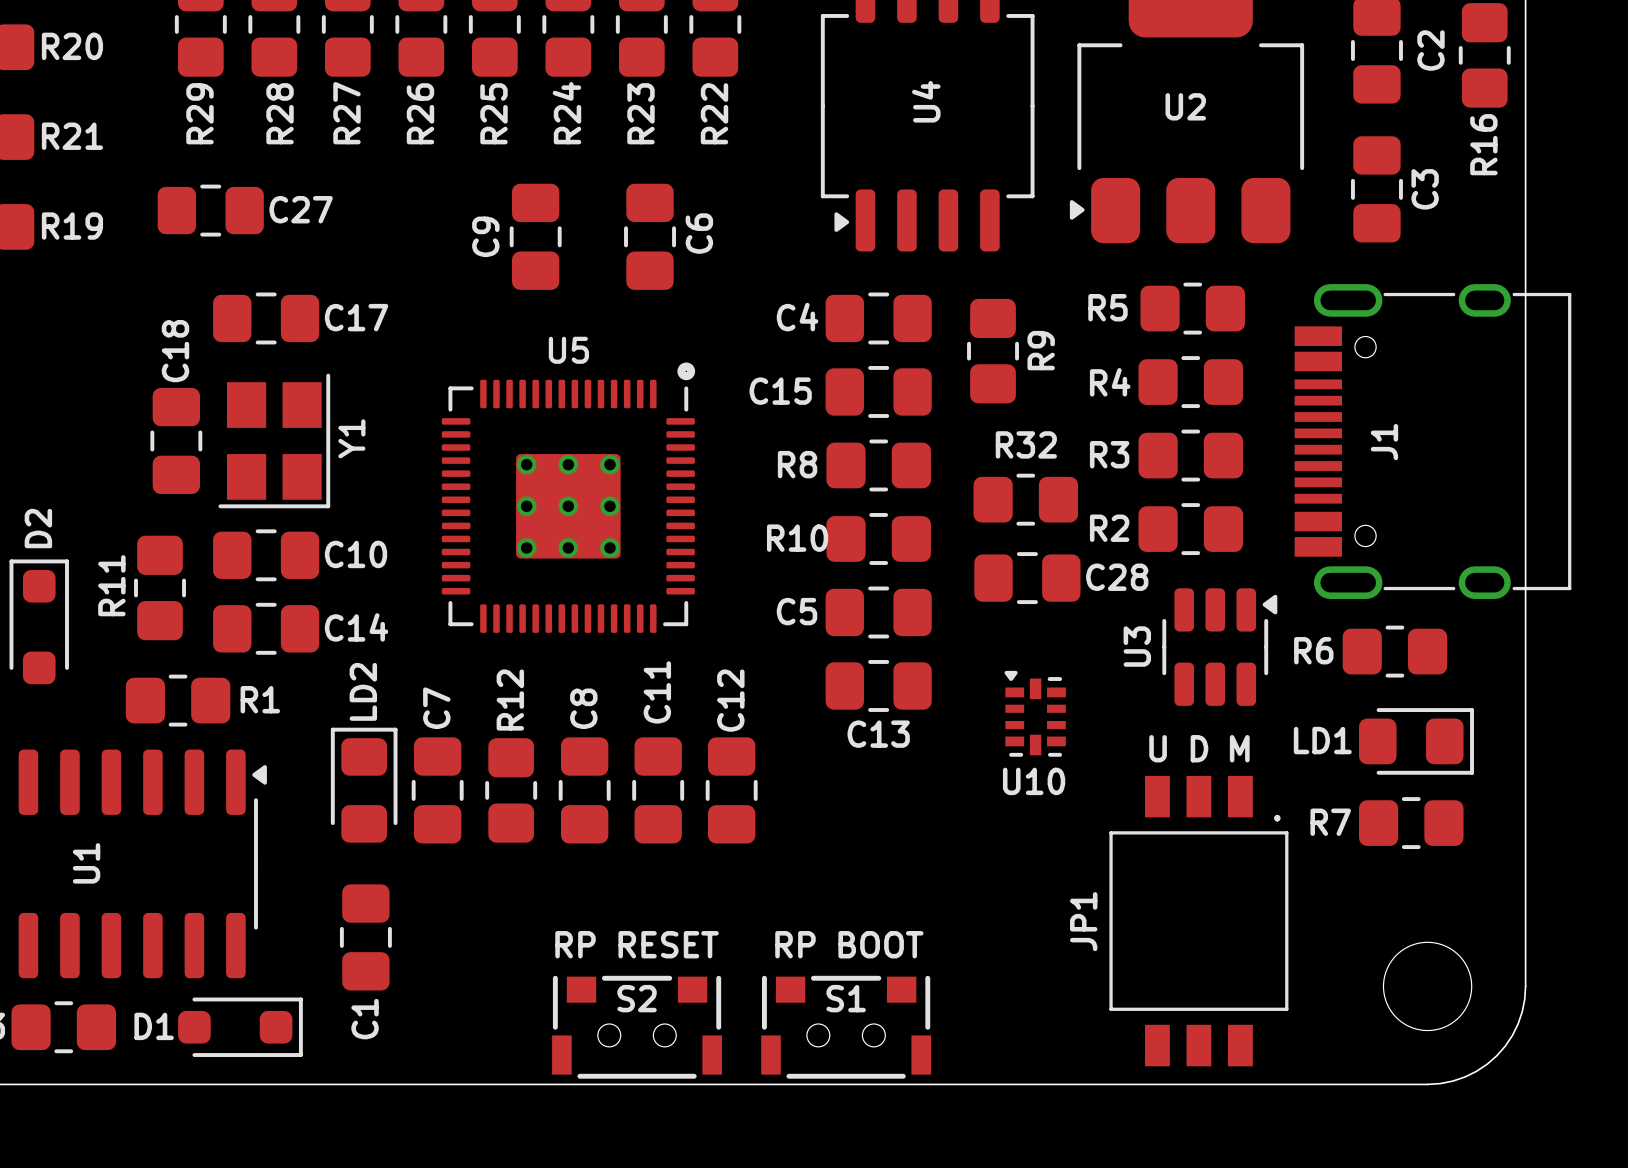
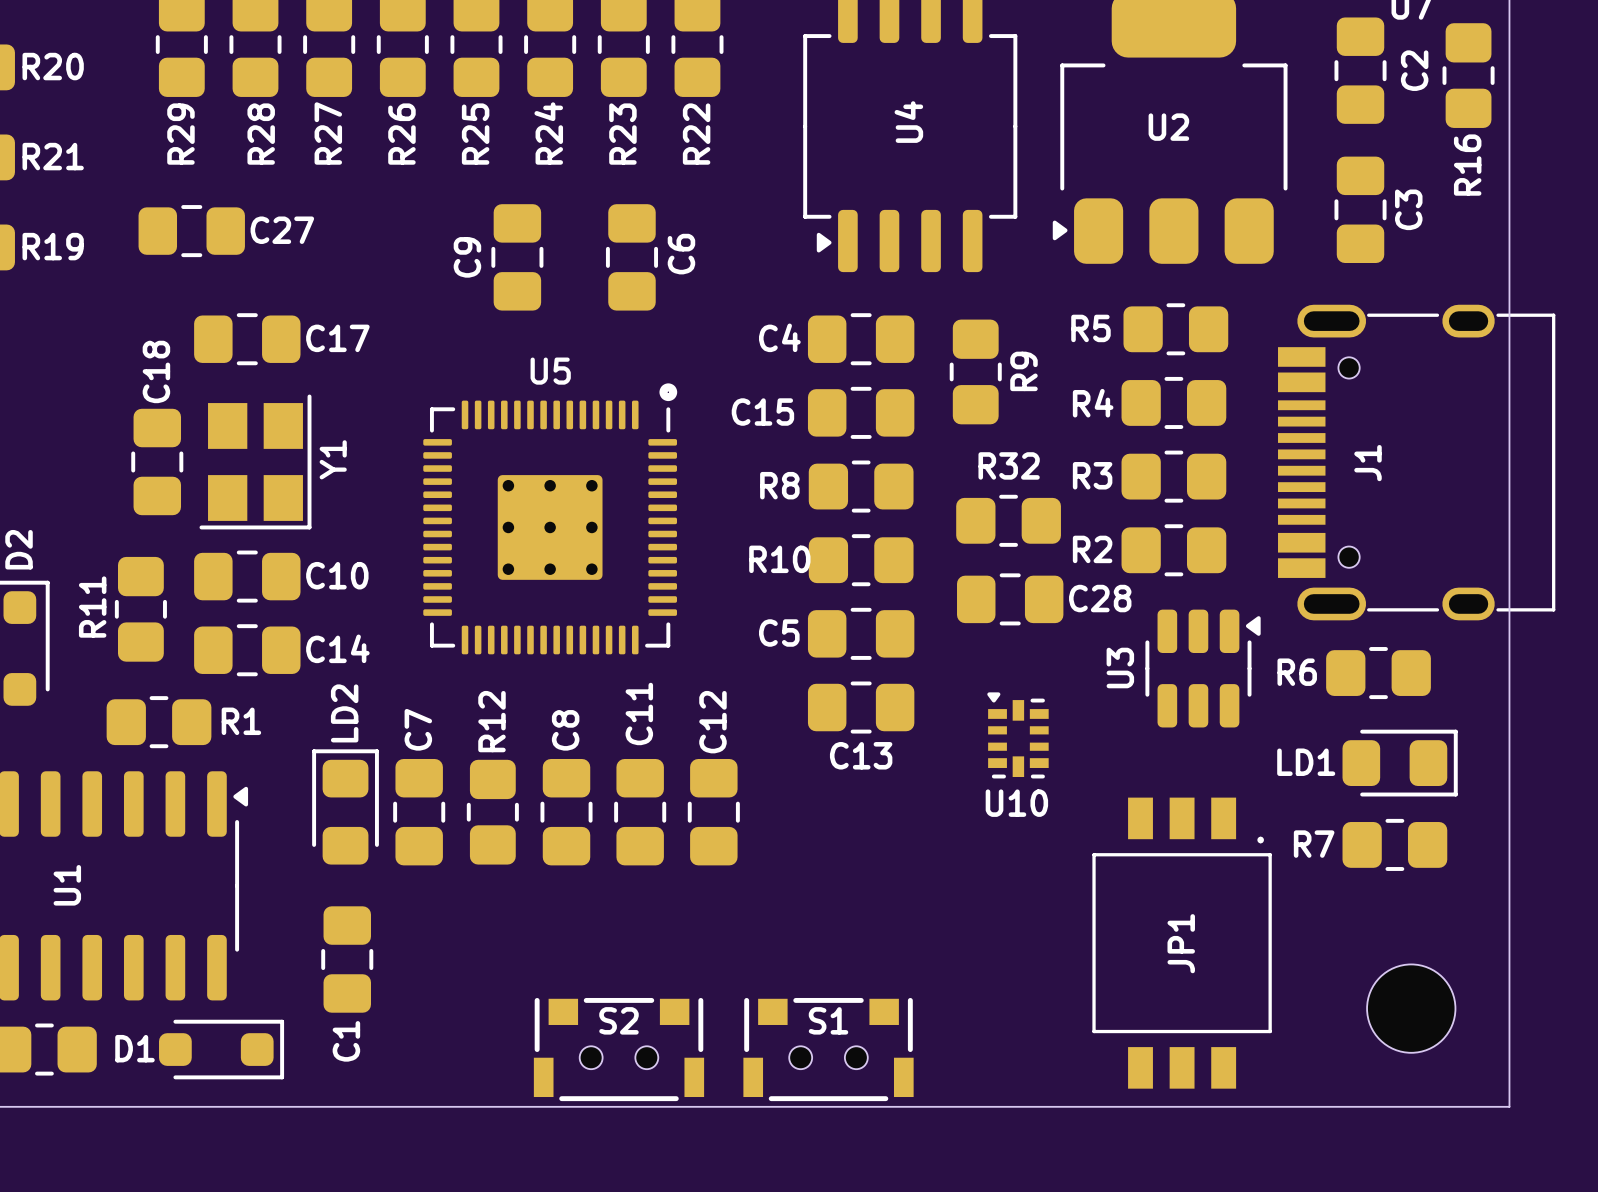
text: U (1158, 748) -> none
text: D (1199, 748) -> none
text: M (1239, 748) -> none
JP1 name position: JP1 (1083, 921) -> JP1 (1181, 943)
text: RP RESET (637, 944) -> none
text: RP BOOT (849, 944) -> none
board edge: (1525, 986) (1522, 1011) (1518, 1023) (1512, 1035) (1496, 1055) (1487, 1064) (1465, 1076) (1440, 1083) (1427, 1084) -> (1509, 1008) (1509, 1106) (1411, 1106)

